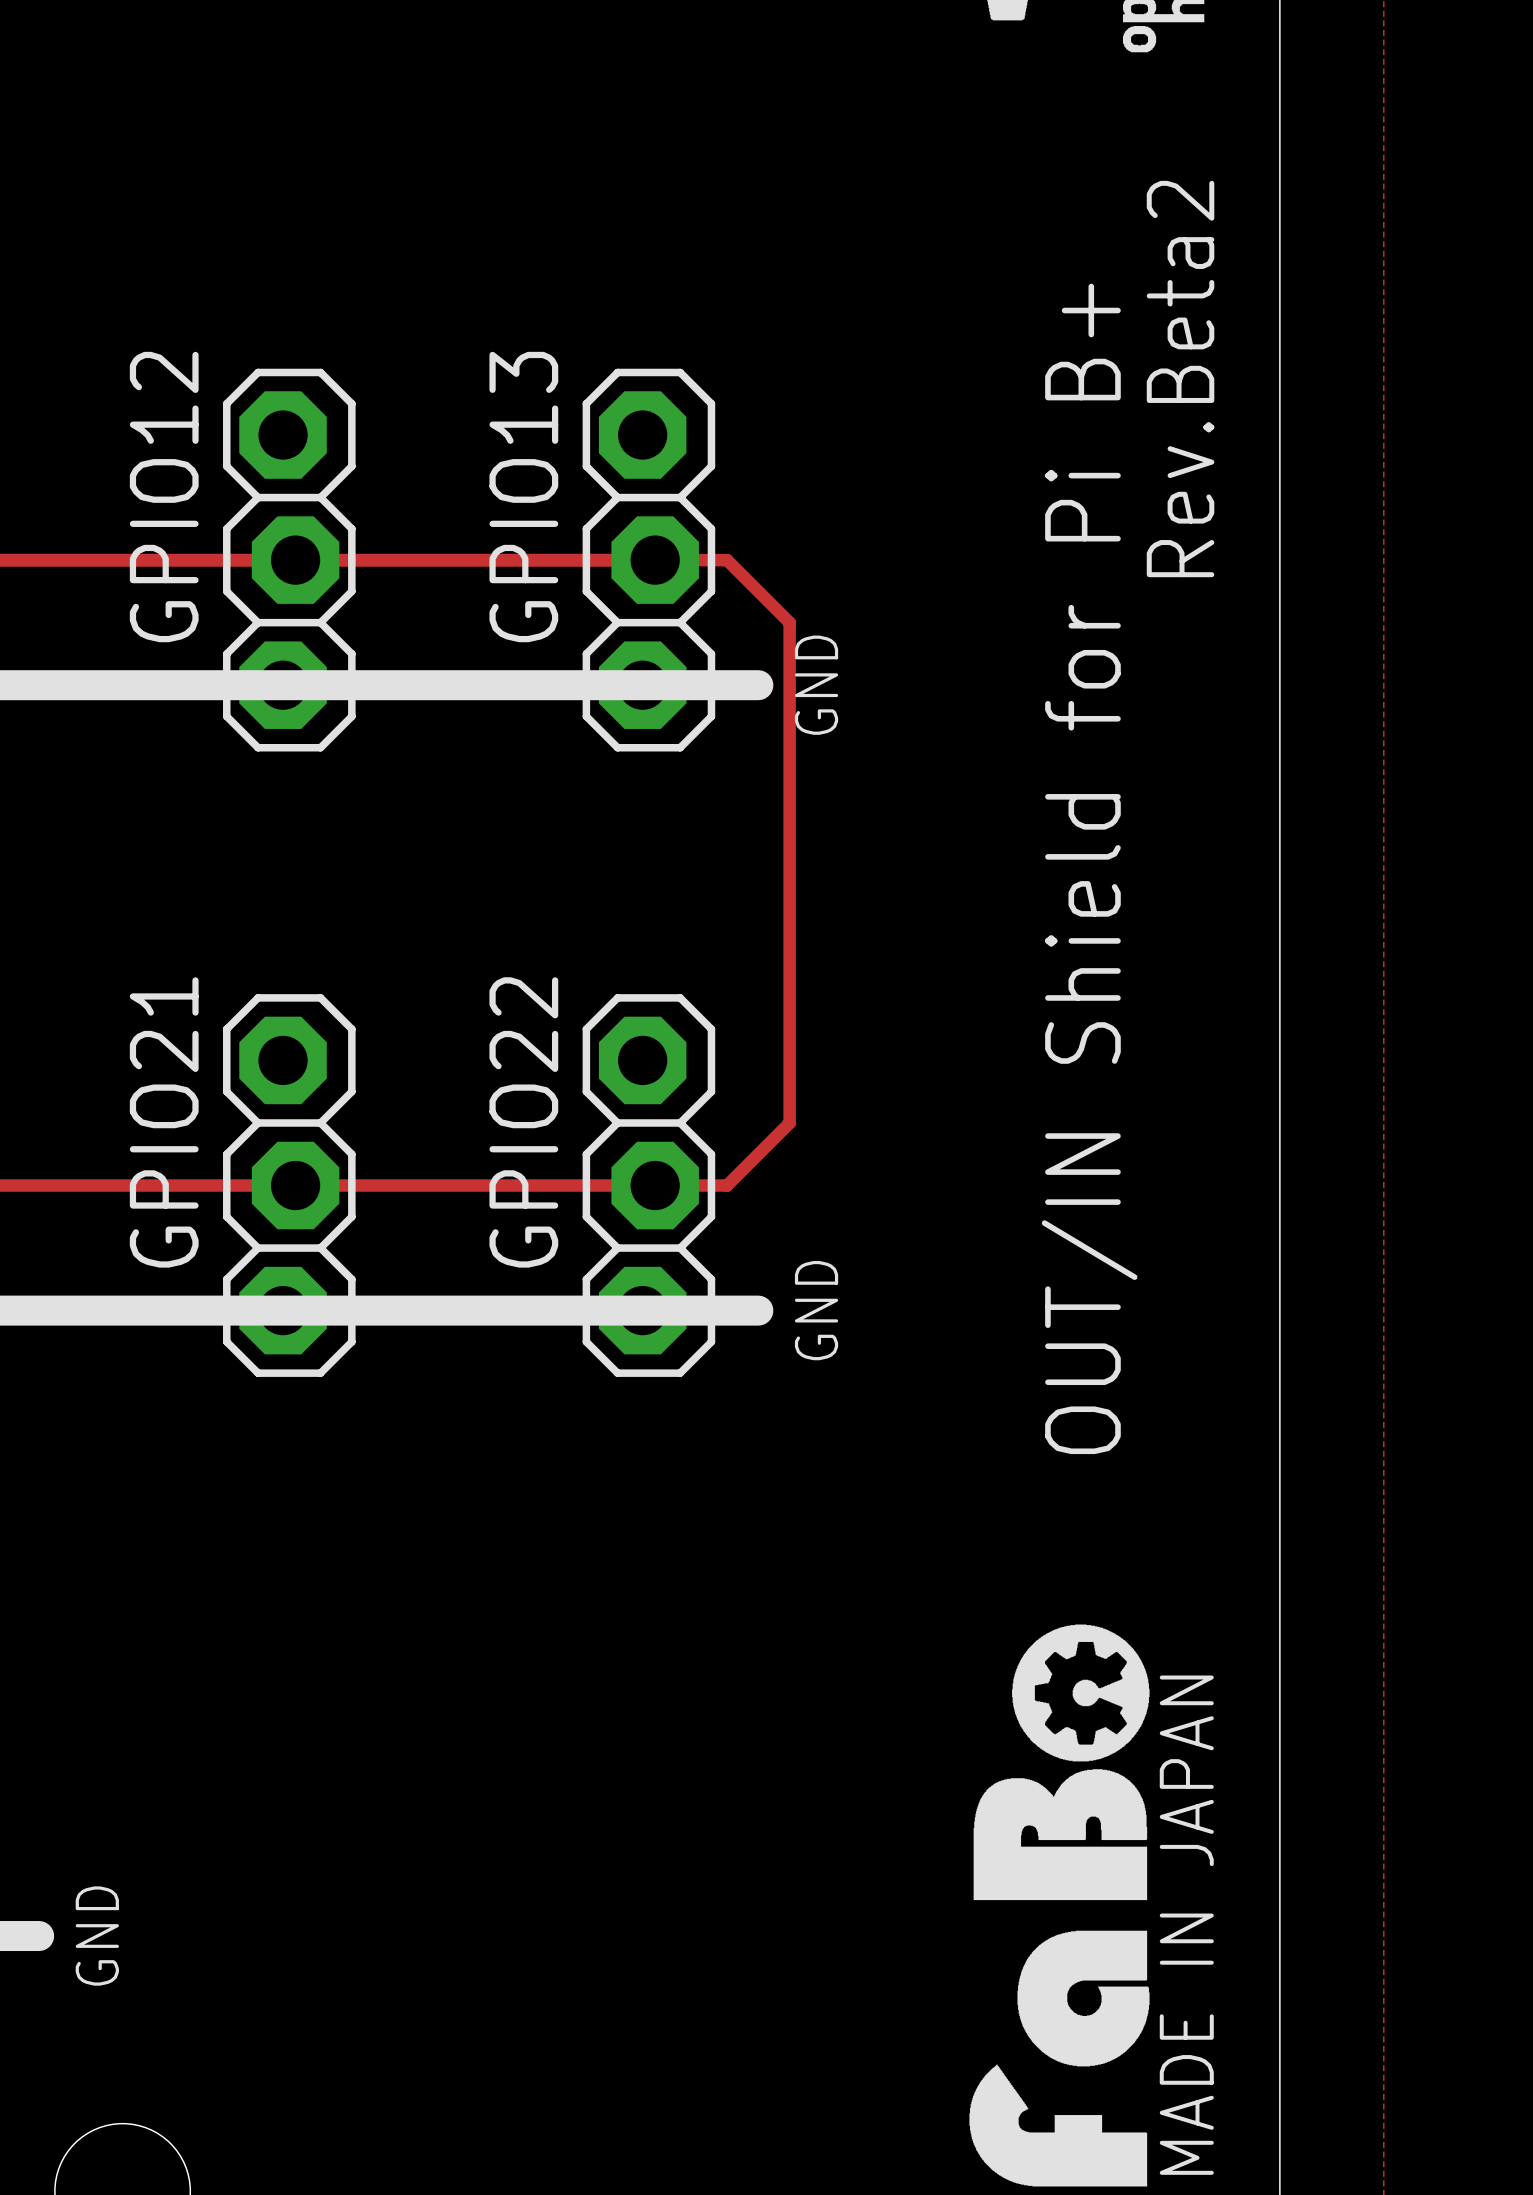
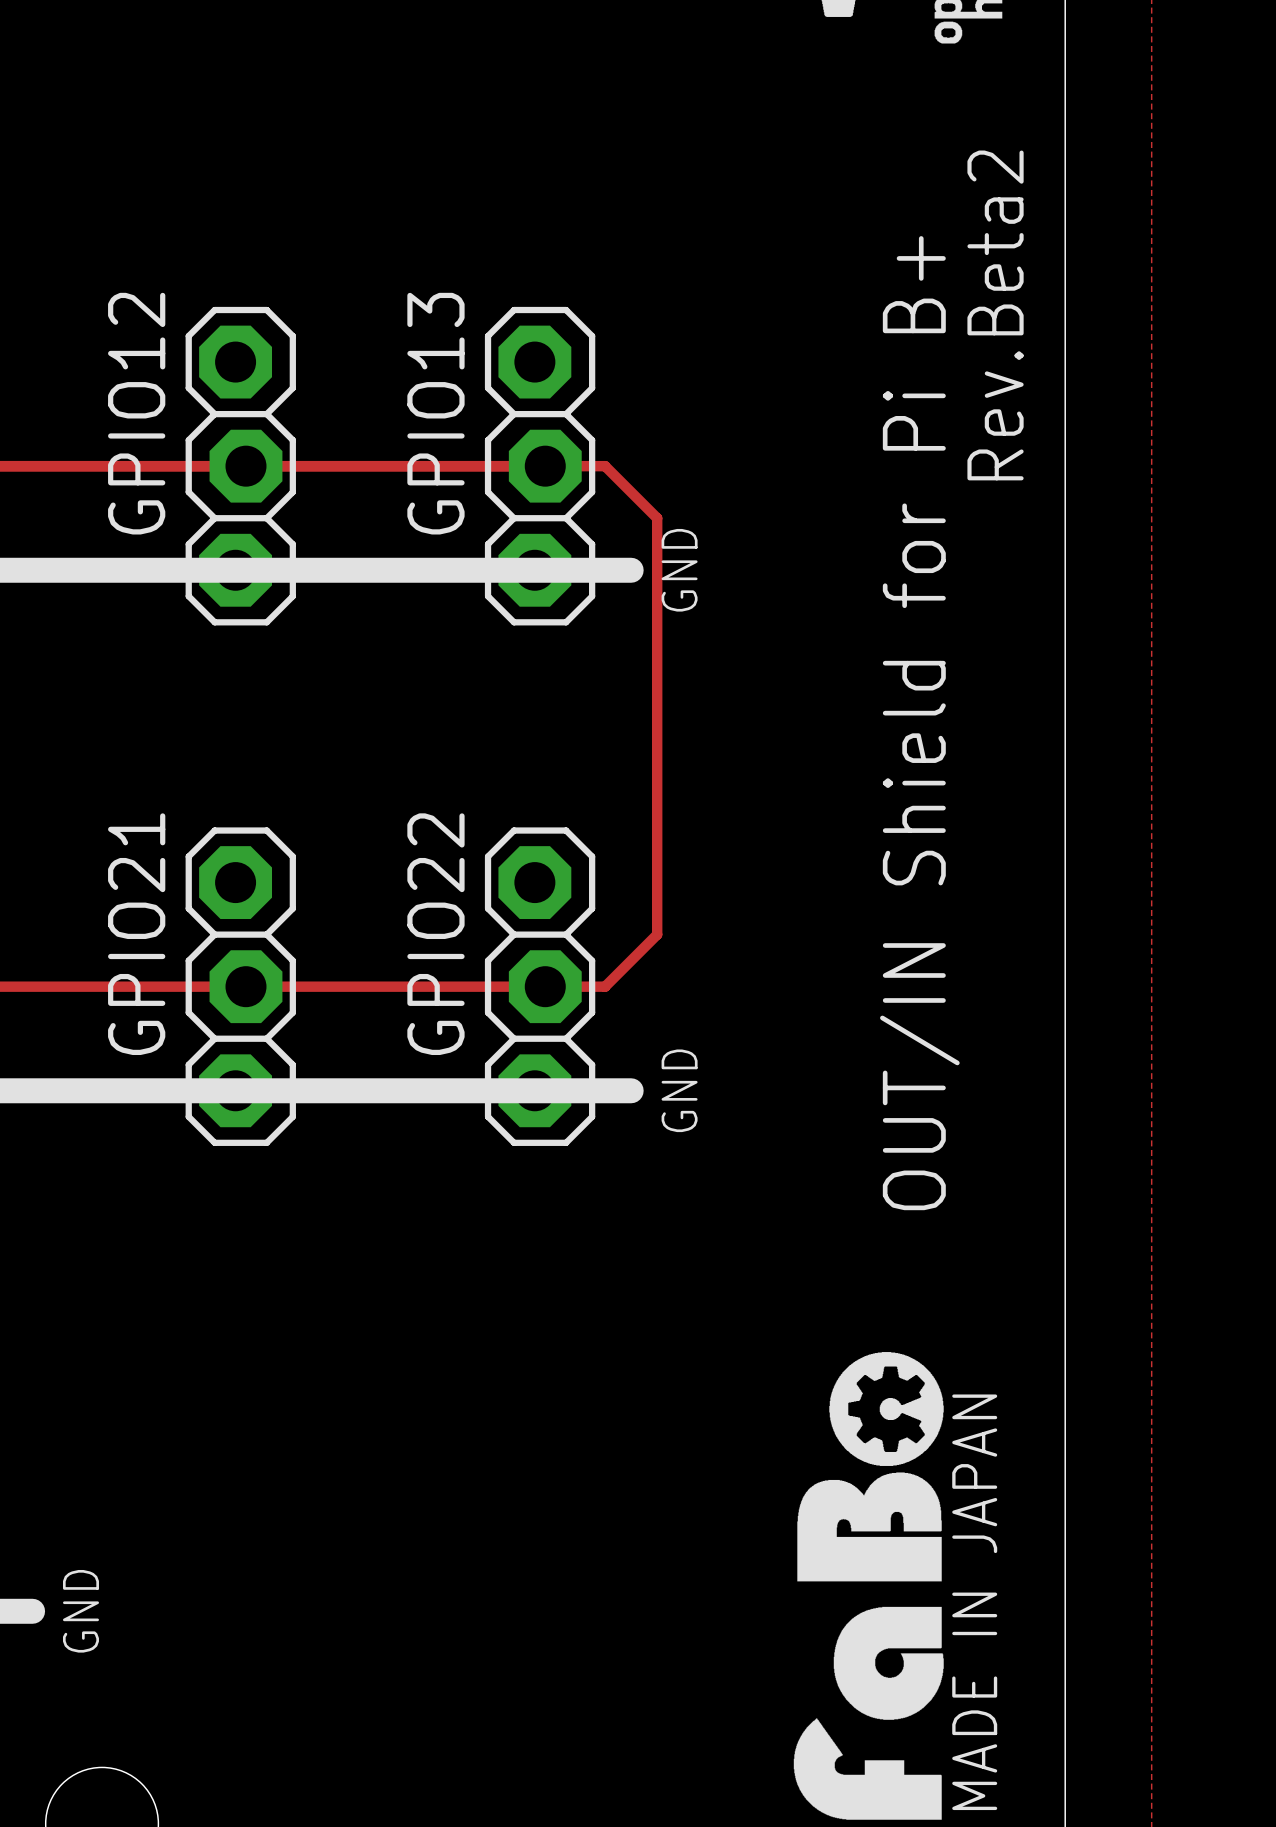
text position: Rev.Beta2 (1180, 379) -> Rev.Beta2 (995, 315)
text position: OUT/IN Shield for Pi B+ (1089, 868) -> OUT/IN Shield for Pi B+ (919, 723)
drawing position: (1059, 1905) -> (868, 1585)
text position: MADE IN JAPAN (1186, 1925) -> MADE IN JAPAN (974, 1602)

